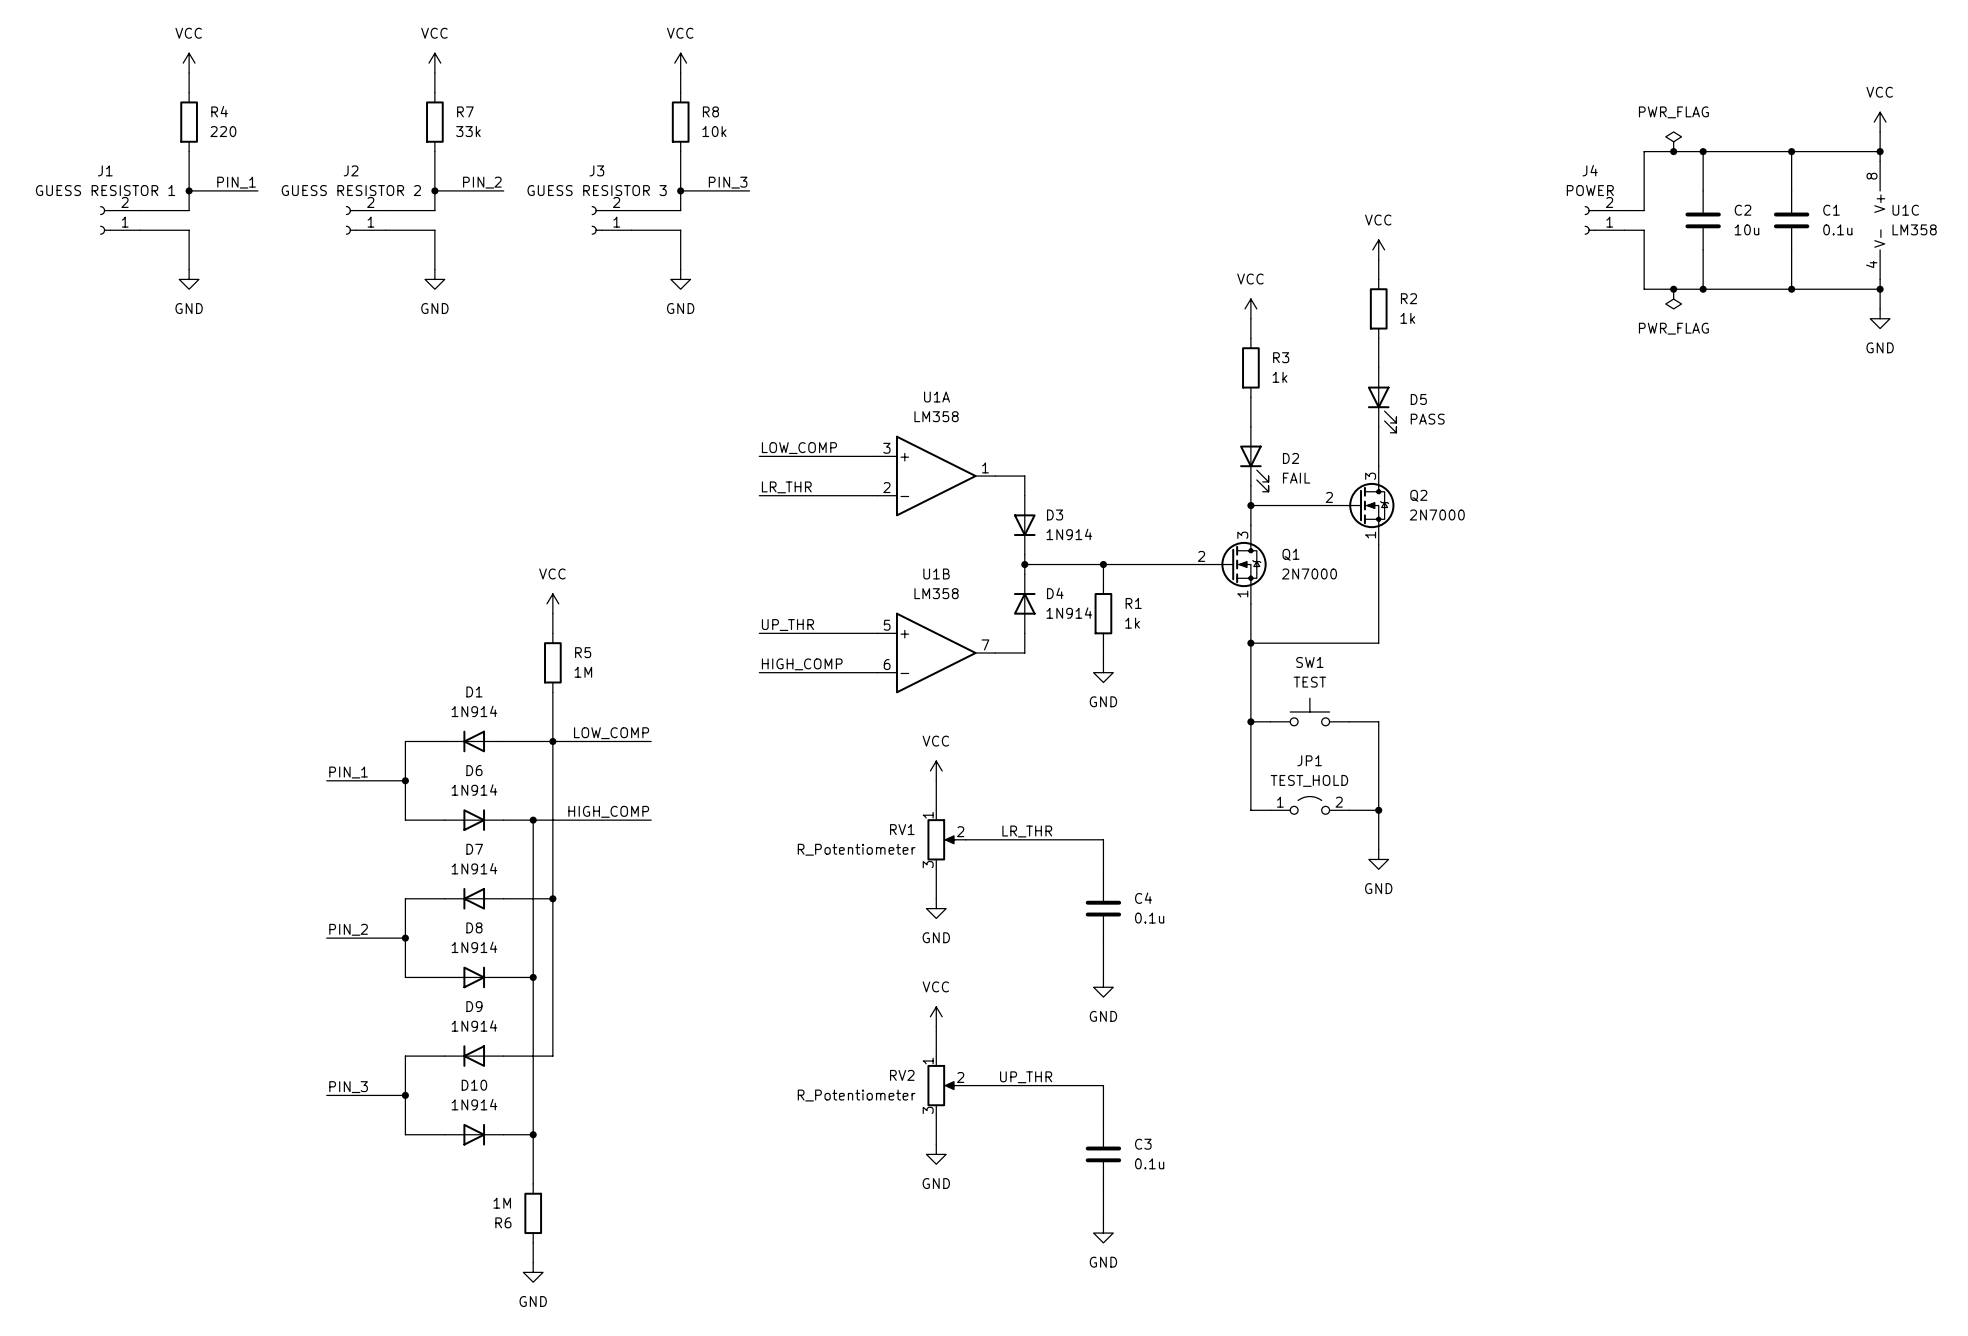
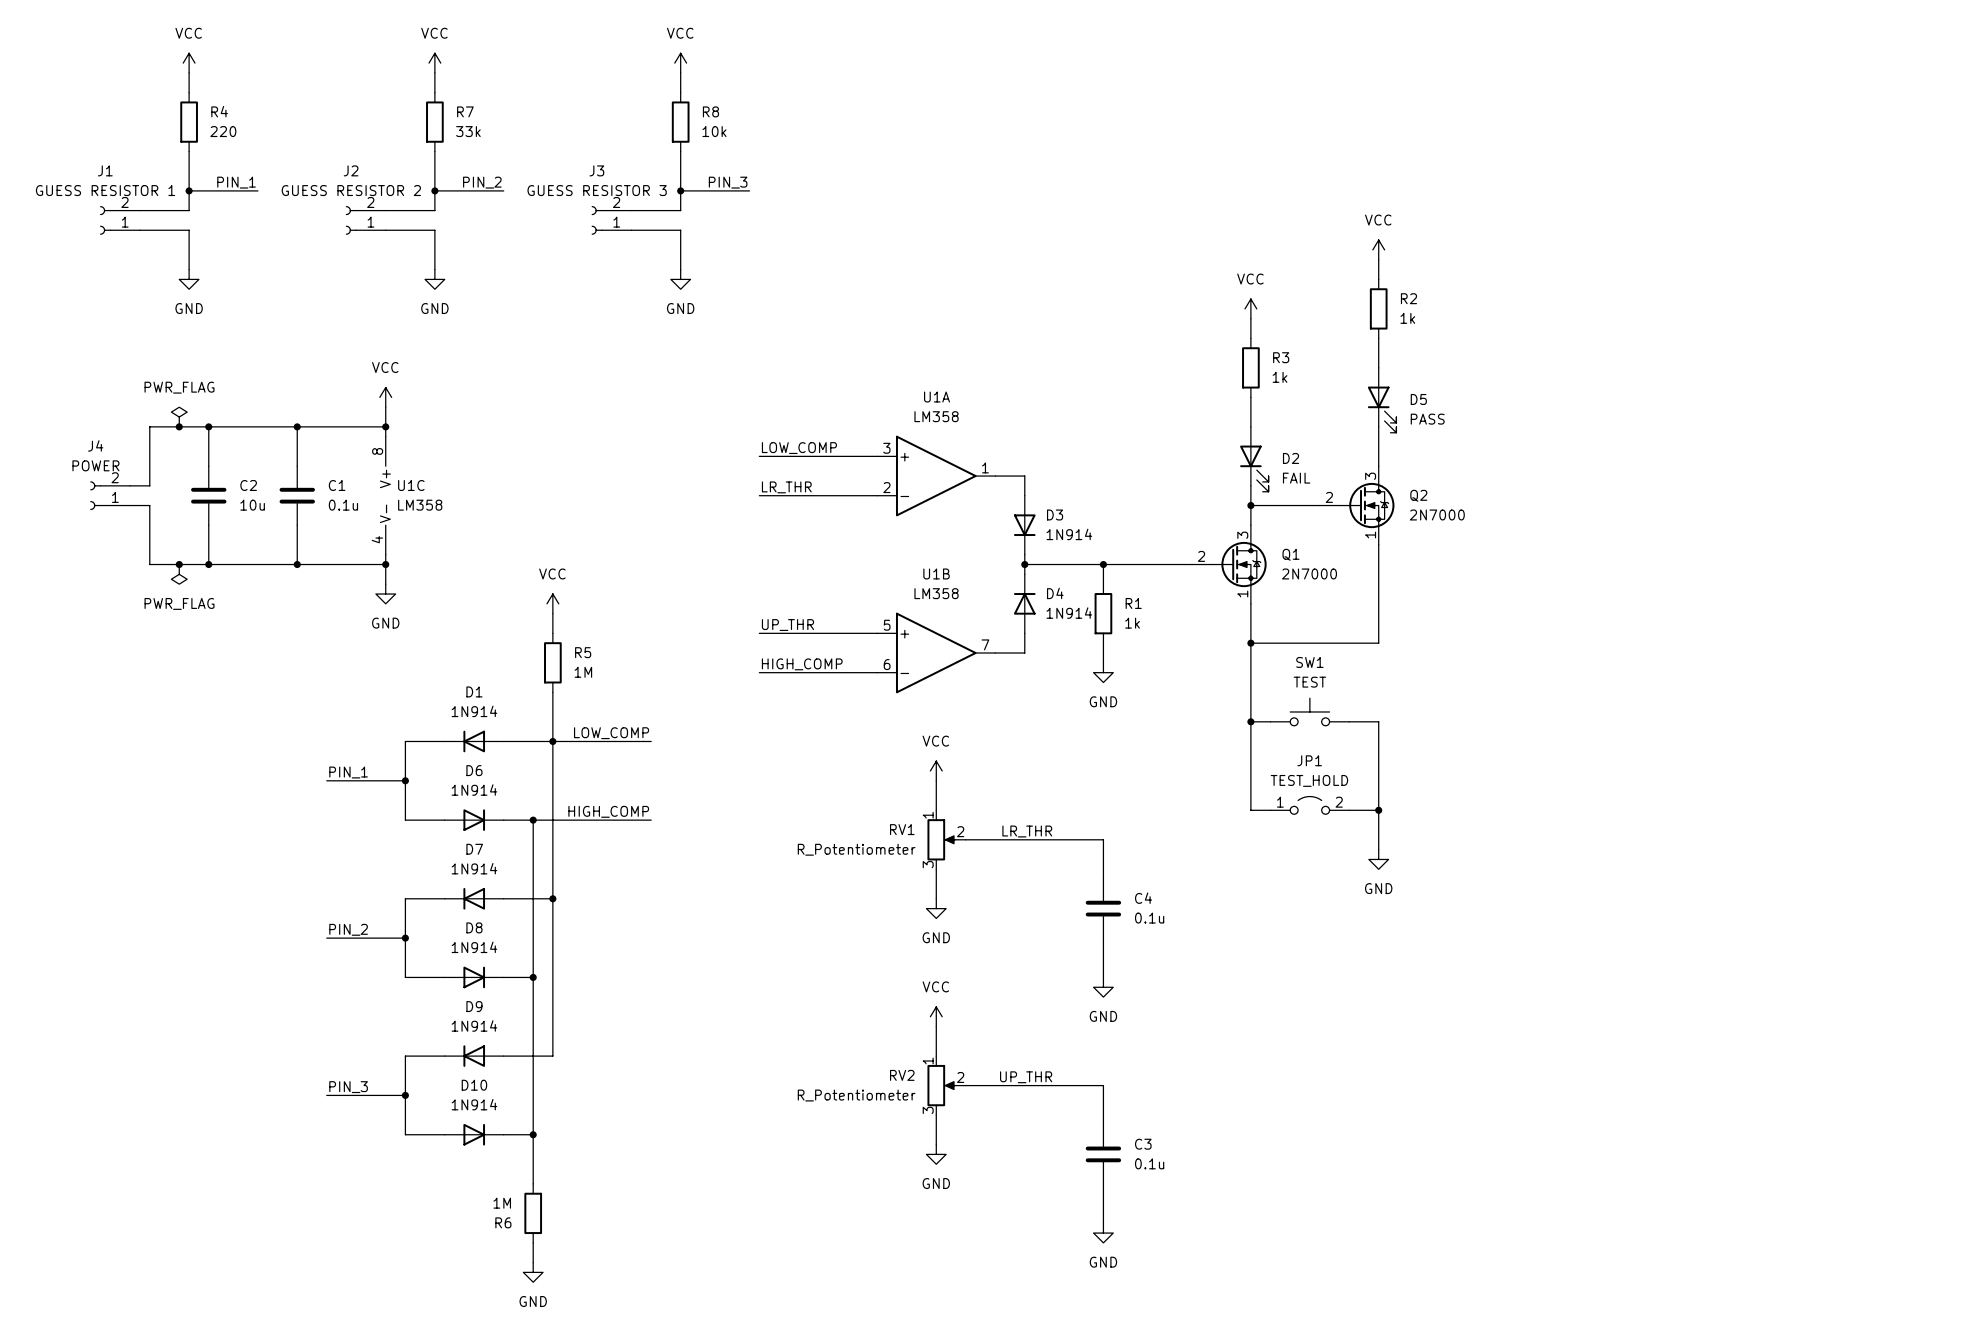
power symbol: VCC (1880, 122) -> none
wire: (1880, 131) (1880, 161) -> none
power symbol: PWR_FLAG (1673, 141) -> none
junction: (1673, 151) -> none
wire: (1703, 151) (1703, 190) -> none
junction: (1703, 151) -> none
wire: (1791, 151) (1791, 190) -> none
junction: (1791, 151) -> none
wire: (1880, 151) (1644, 151) (1644, 210) (1624, 210) -> none
junction: (1880, 151) -> none
J4 position: (1604, 220) -> (110, 495)
C2 position: (1703, 220) -> (208, 495)
C1 position: (1791, 220) -> (297, 495)
U1C position: (1880, 220) -> (385, 495)
wire: (1624, 230) (1644, 230) (1644, 289) (1880, 289) -> none
wire: (1703, 249) (1703, 289) -> none
wire: (1791, 249) (1791, 289) -> none
wire: (1880, 279) (1880, 308) -> none
junction: (1673, 289) -> none
junction: (1703, 289) -> none
junction: (1791, 289) -> none
junction: (1880, 289) -> none
power symbol: PWR_FLAG (1673, 299) -> none
power symbol: GND (1880, 318) -> none
power symbol: none -> VCC (385, 397)
wire: none -> (385, 407) (385, 436)
power symbol: none -> PWR_FLAG (179, 417)
junction: none -> (179, 426)
wire: none -> (208, 426) (208, 466)
junction: none -> (208, 426)
wire: none -> (297, 426) (297, 466)
junction: none -> (297, 426)
wire: none -> (385, 426) (149, 426) (149, 485) (130, 485)
junction: none -> (385, 426)
wire: none -> (130, 505) (149, 505) (149, 564) (385, 564)
wire: none -> (208, 525) (208, 564)
wire: none -> (297, 525) (297, 564)
wire: none -> (385, 554) (385, 584)
junction: none -> (179, 564)
junction: none -> (208, 564)
junction: none -> (297, 564)
junction: none -> (385, 564)
power symbol: none -> PWR_FLAG (179, 574)
power symbol: none -> GND (385, 594)

